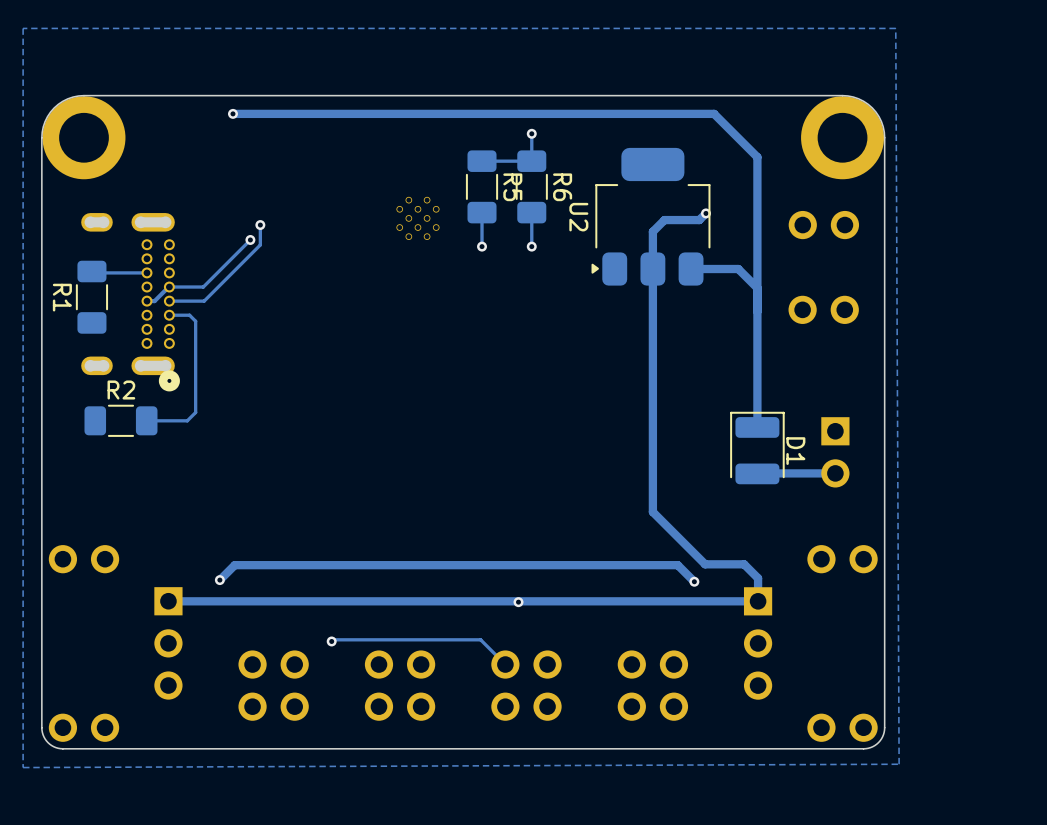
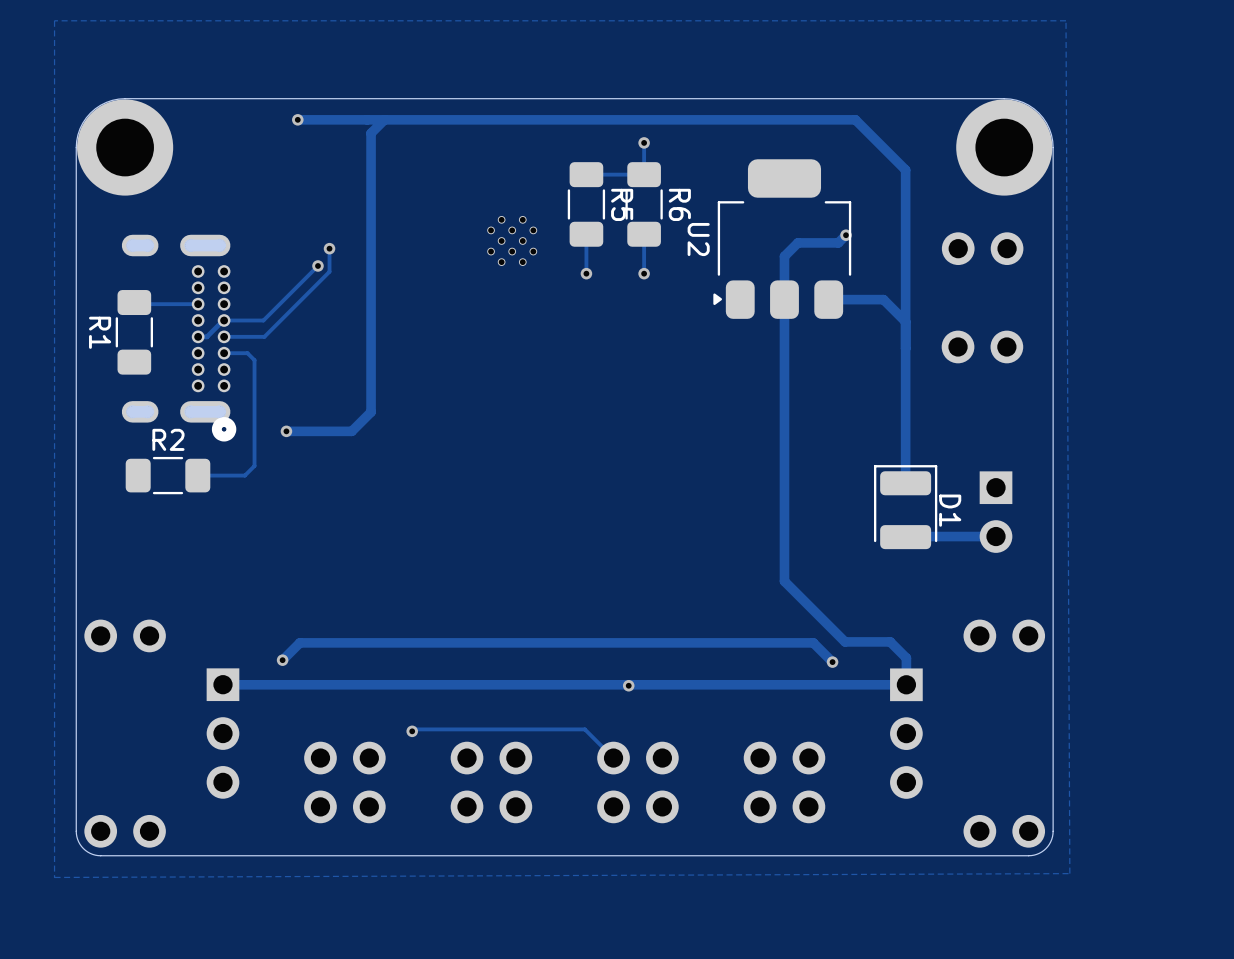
track: none -> (384, 119) (371, 133) (371, 412) (351, 431) (286, 431)
via: none -> (286, 431)

